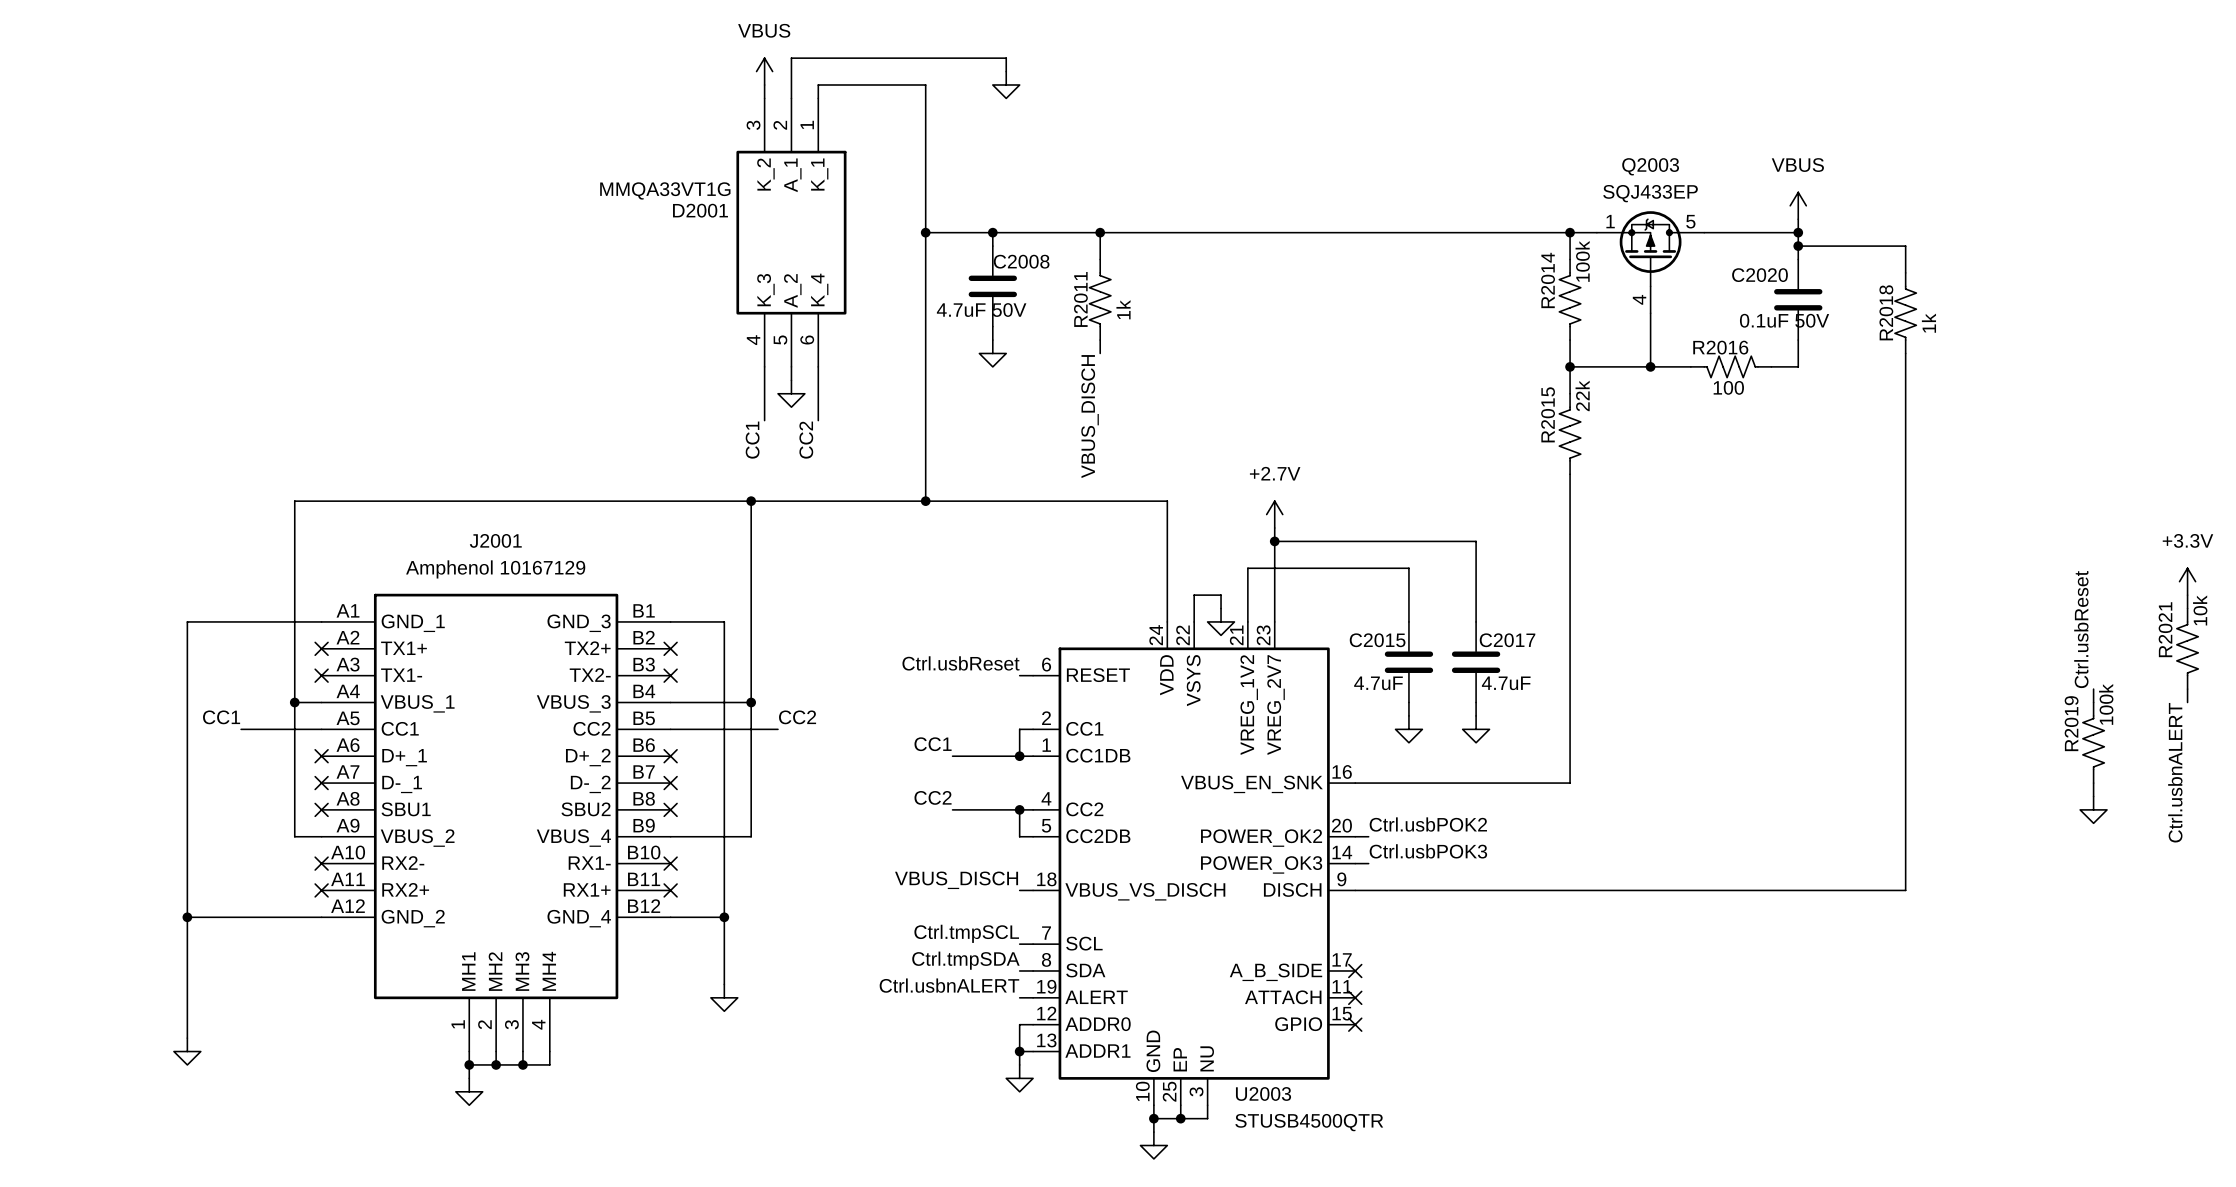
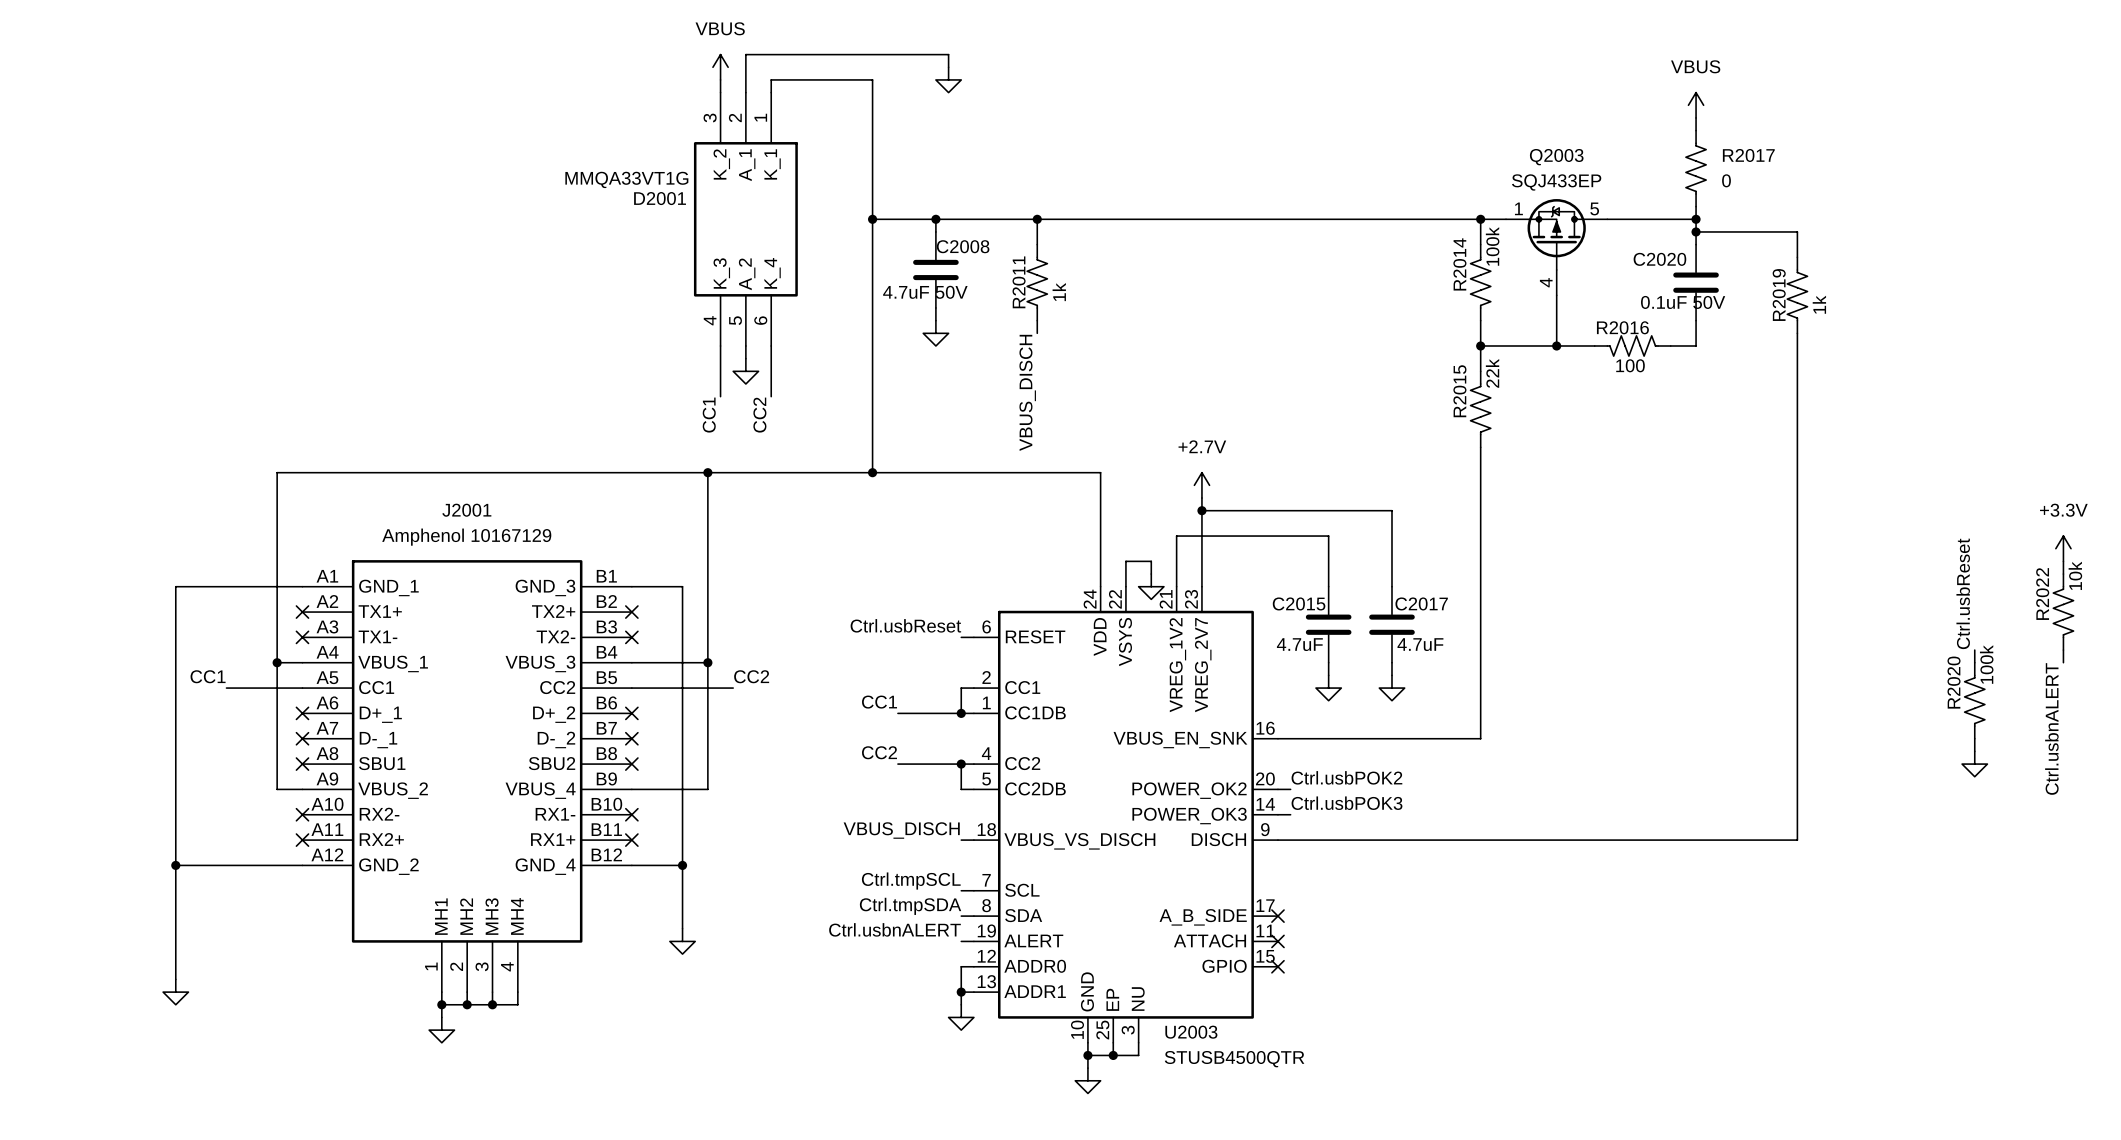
wire: none -> (1696, 117) (1696, 130)
R2017: none -> 0 (1696, 168)
power symbol position: VBUS (1798, 205) -> VBUS (1696, 105)
R2018 name: R2018 (1886, 312) -> R2019 (1779, 295)
R2021 name: R2021 (2165, 629) -> R2022 (2042, 594)
R2019 name: R2019 (2071, 723) -> R2020 (1954, 682)

